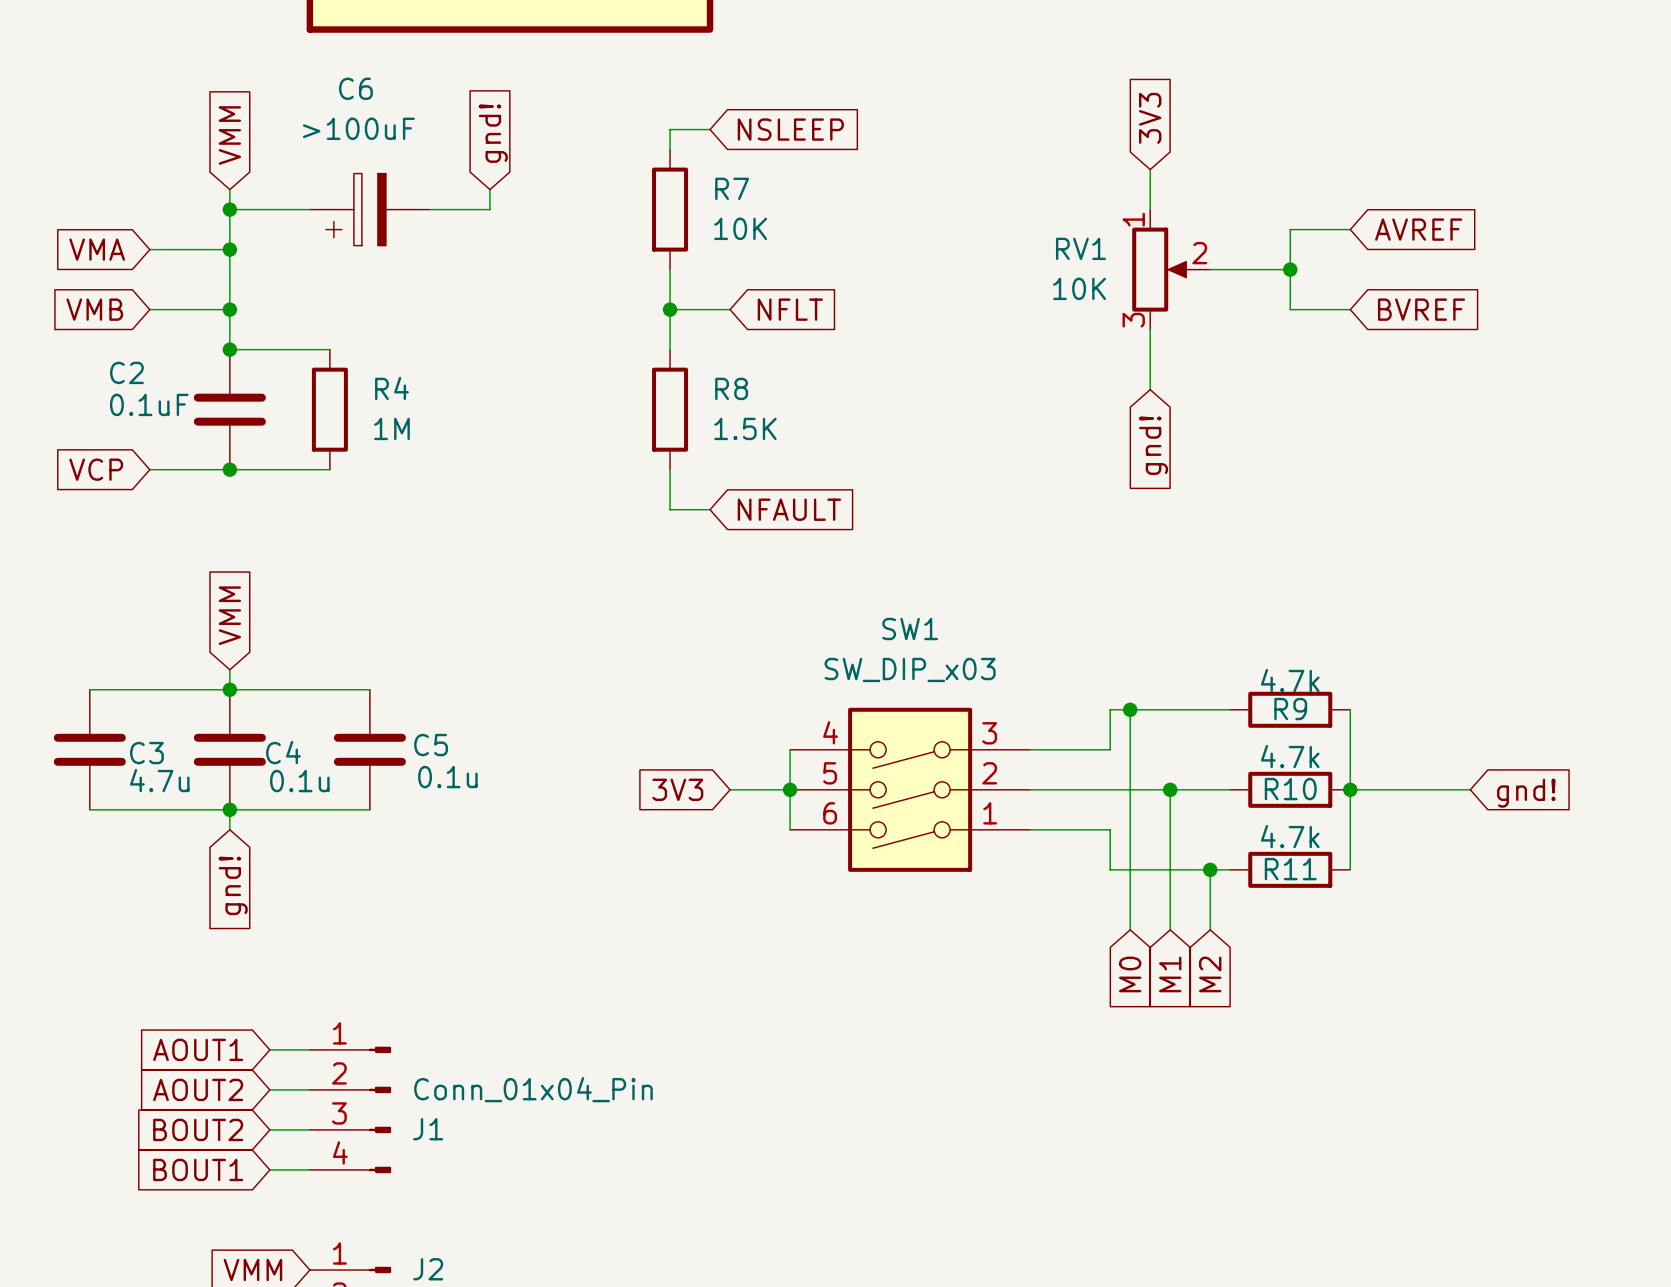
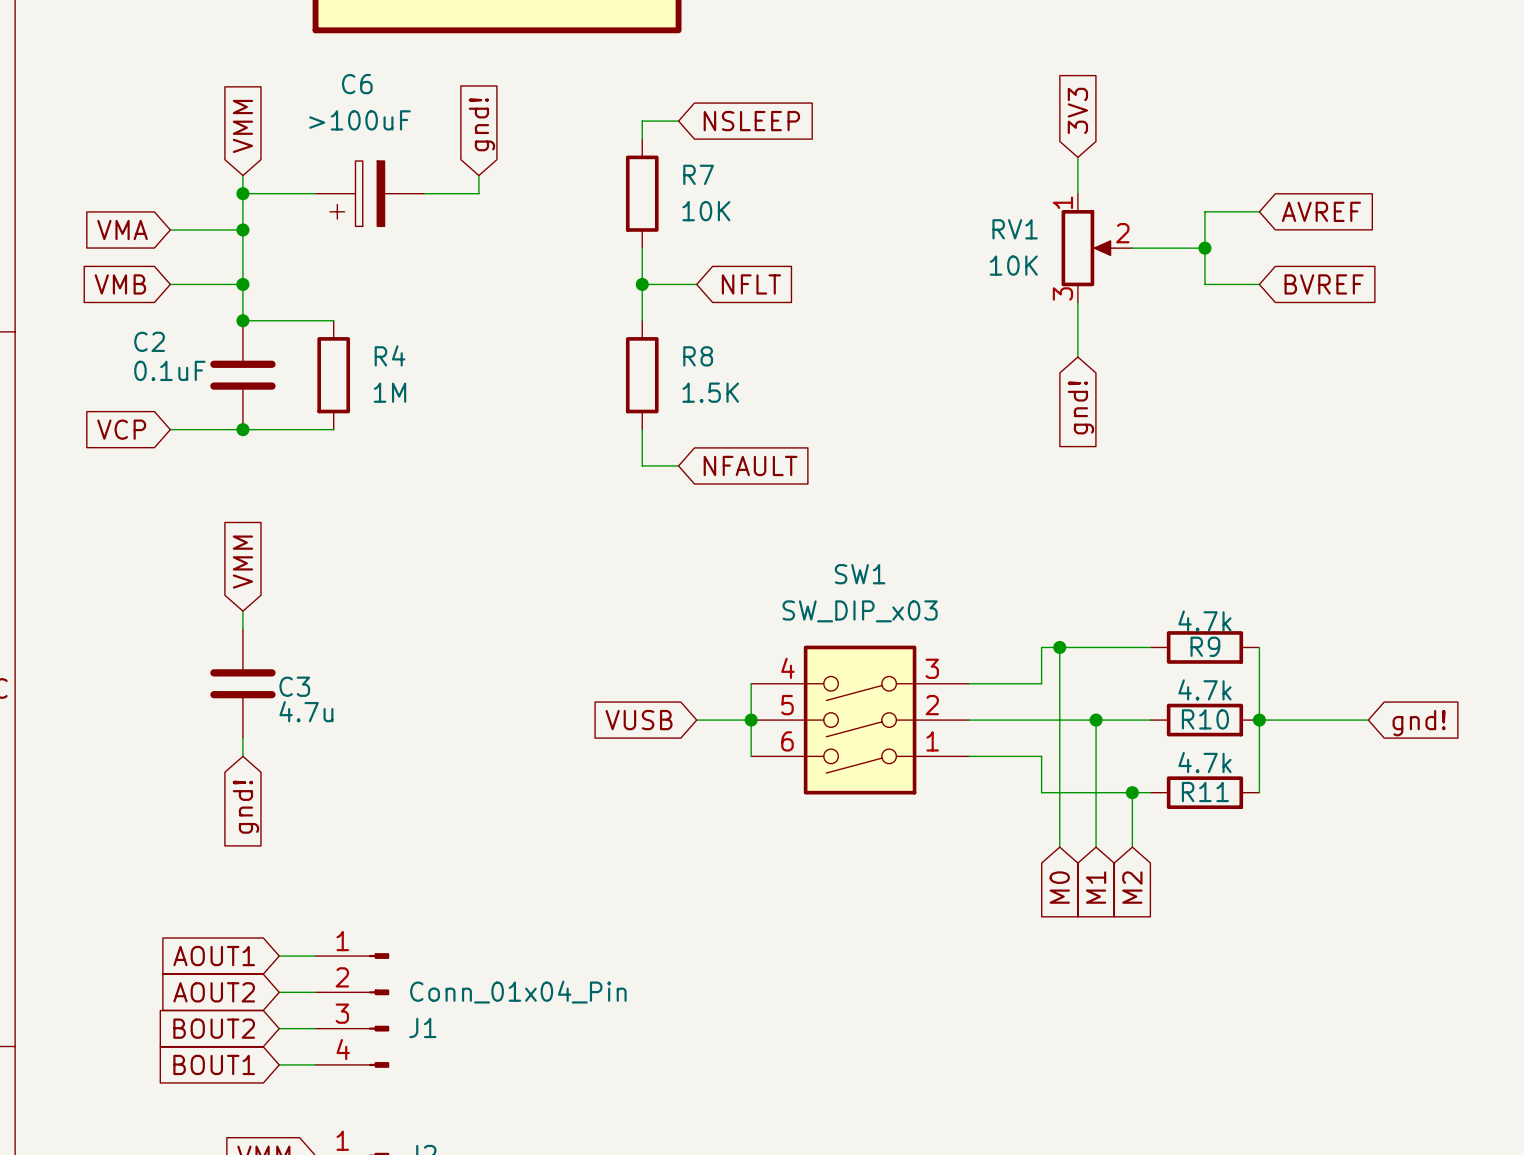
wire: (89, 689) (369, 689) -> none
junction: (229, 689) -> none
C3: 4.7u (89, 749) -> none
C5: 0.1u (369, 749) -> none
C4 name: C4 (283, 752) -> C3 (294, 686)
C4 value: 0.1u (299, 781) -> 4.7u (306, 711)
global label: 3V3 (677, 789) -> VUSB (639, 720)
wire: (89, 809) (369, 809) -> none
junction: (229, 809) -> none

